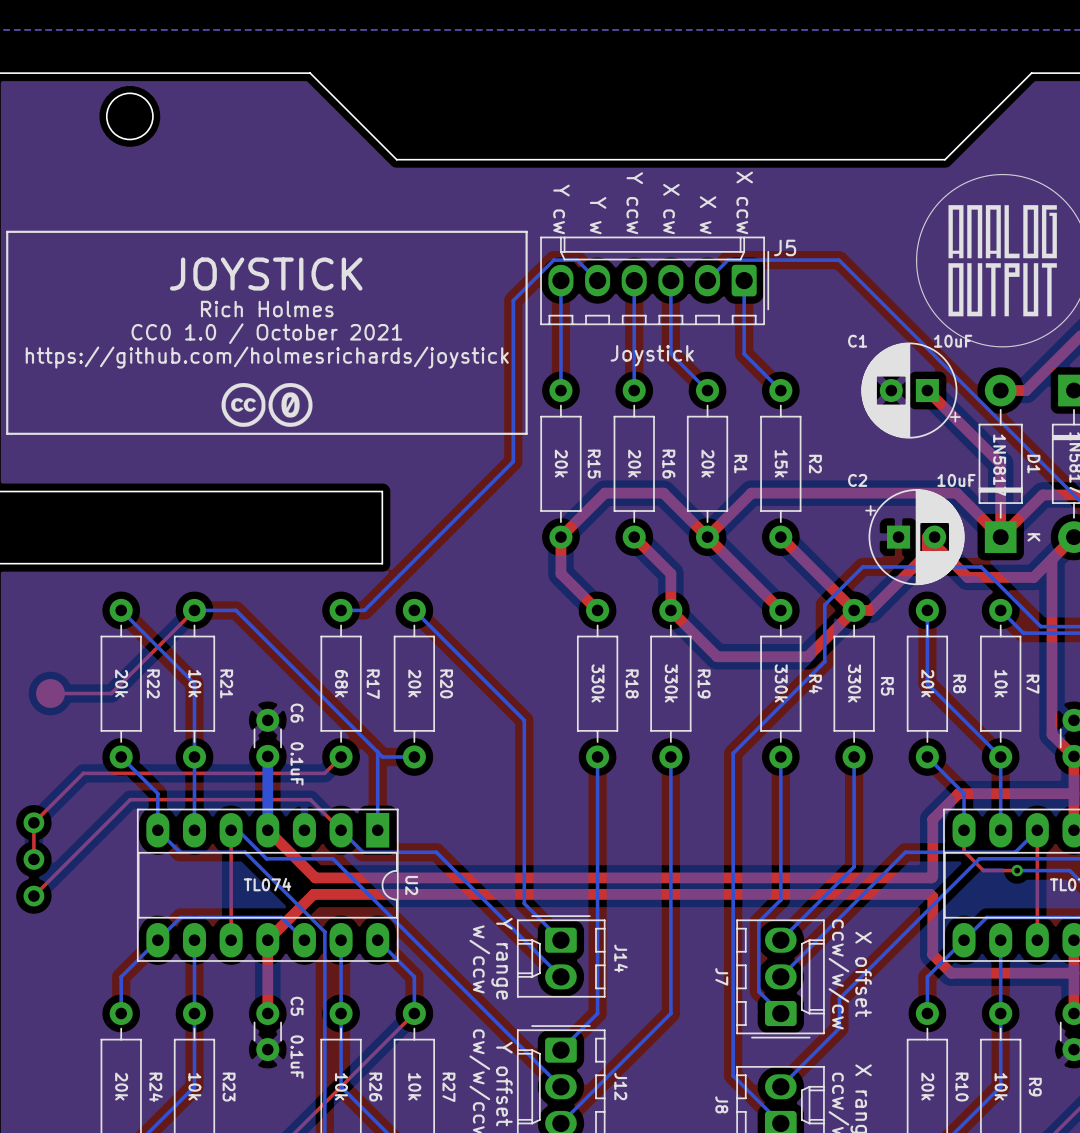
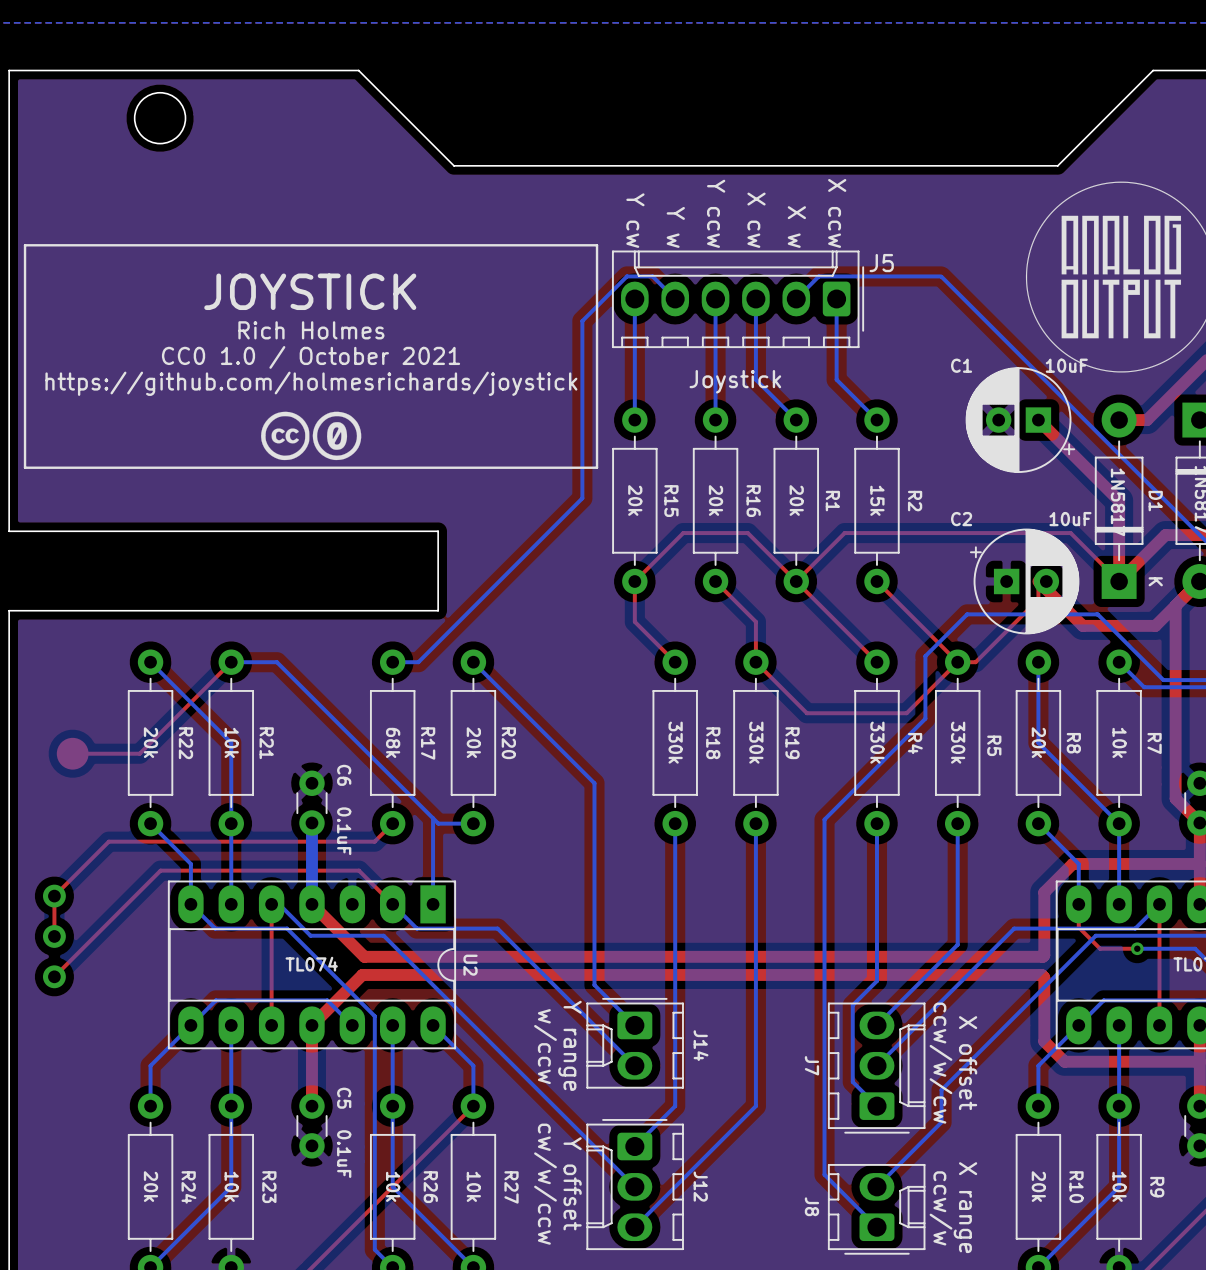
top track width: thick (634, 537) (670, 573) (670, 610) (717, 656) (807, 656) (854, 610) -> thin (715, 581) (755, 621) (755, 662) (806, 713) (906, 713) (957, 662)
top track width: thick (780, 537) (854, 610) -> thin (876, 581) (957, 662)
top track width: thick (927, 537) (927, 553) (870, 610) (854, 610) -> thin (1038, 581) (1038, 599) (975, 662) (957, 662)
top track width: thick (1000, 537) (956, 493) (751, 493) (707, 537) -> thin (1119, 581) (1070, 533) (844, 533) (796, 581)
top track width: thick (780, 610) (663, 493) (604, 493) (560, 537) (560, 573) (597, 610) -> thin (876, 662) (747, 533) (683, 533) (634, 581) (634, 621) (675, 662)

